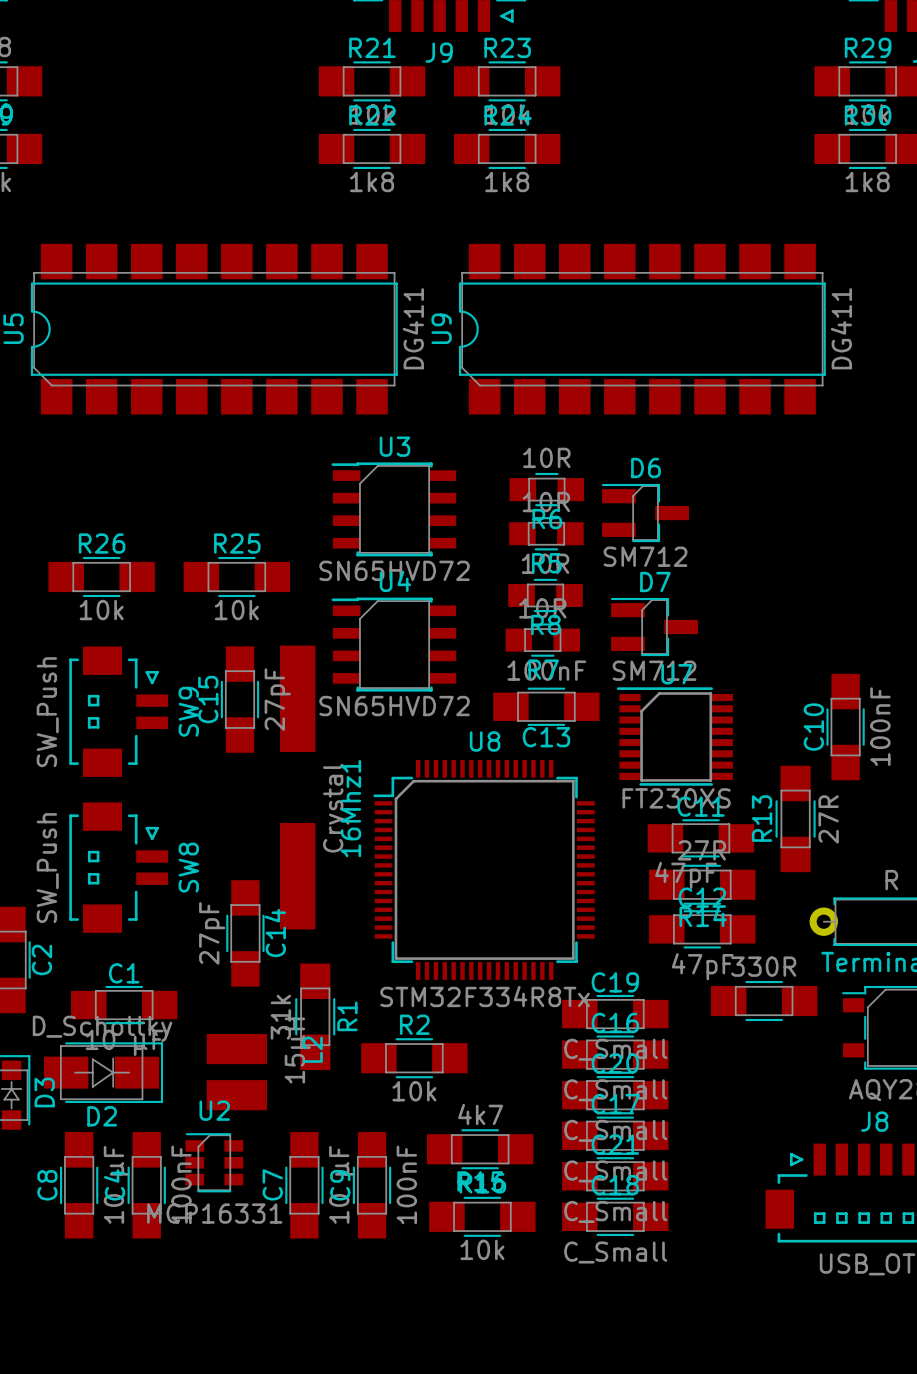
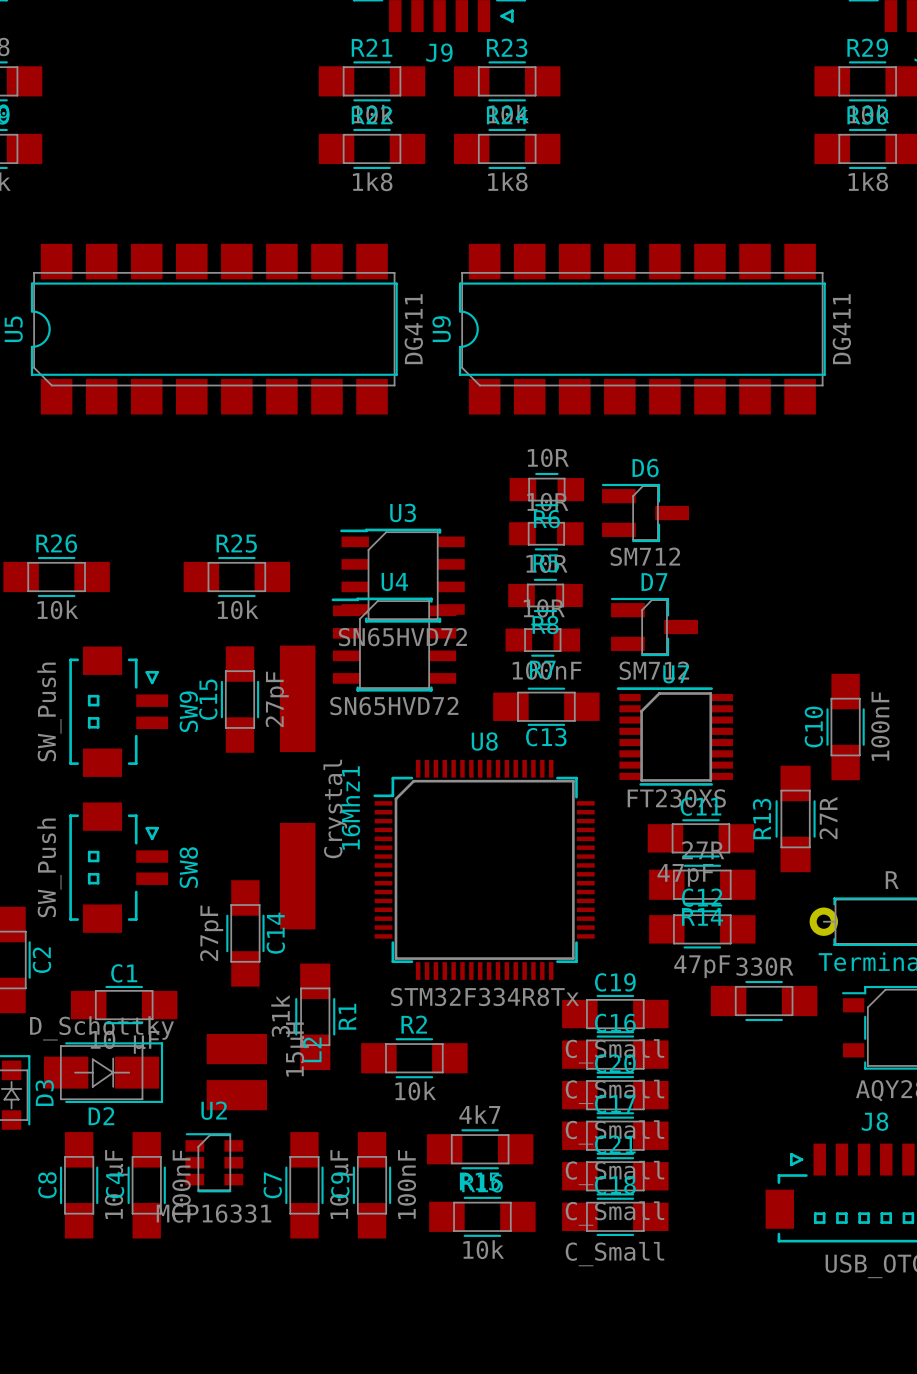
U3 position: (393, 509) -> (402, 575)
R26 position: (101, 577) -> (56, 577)

